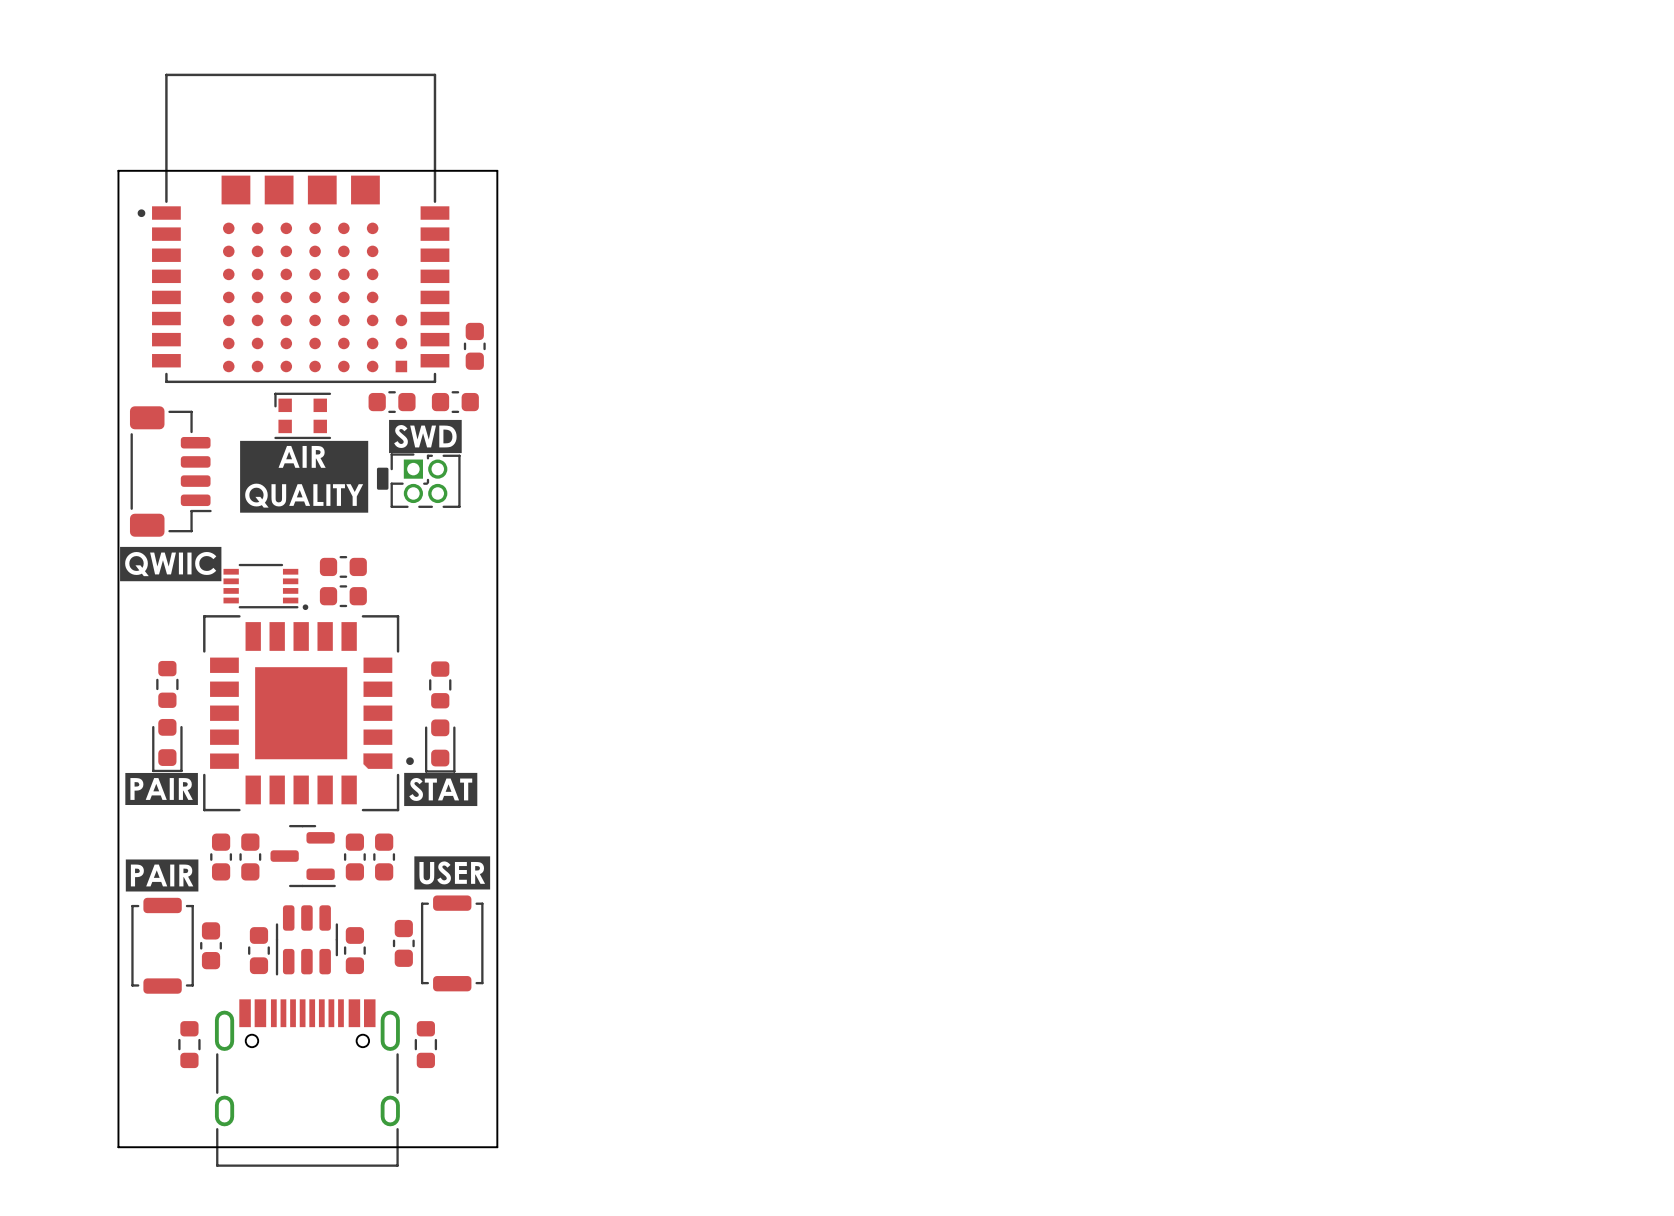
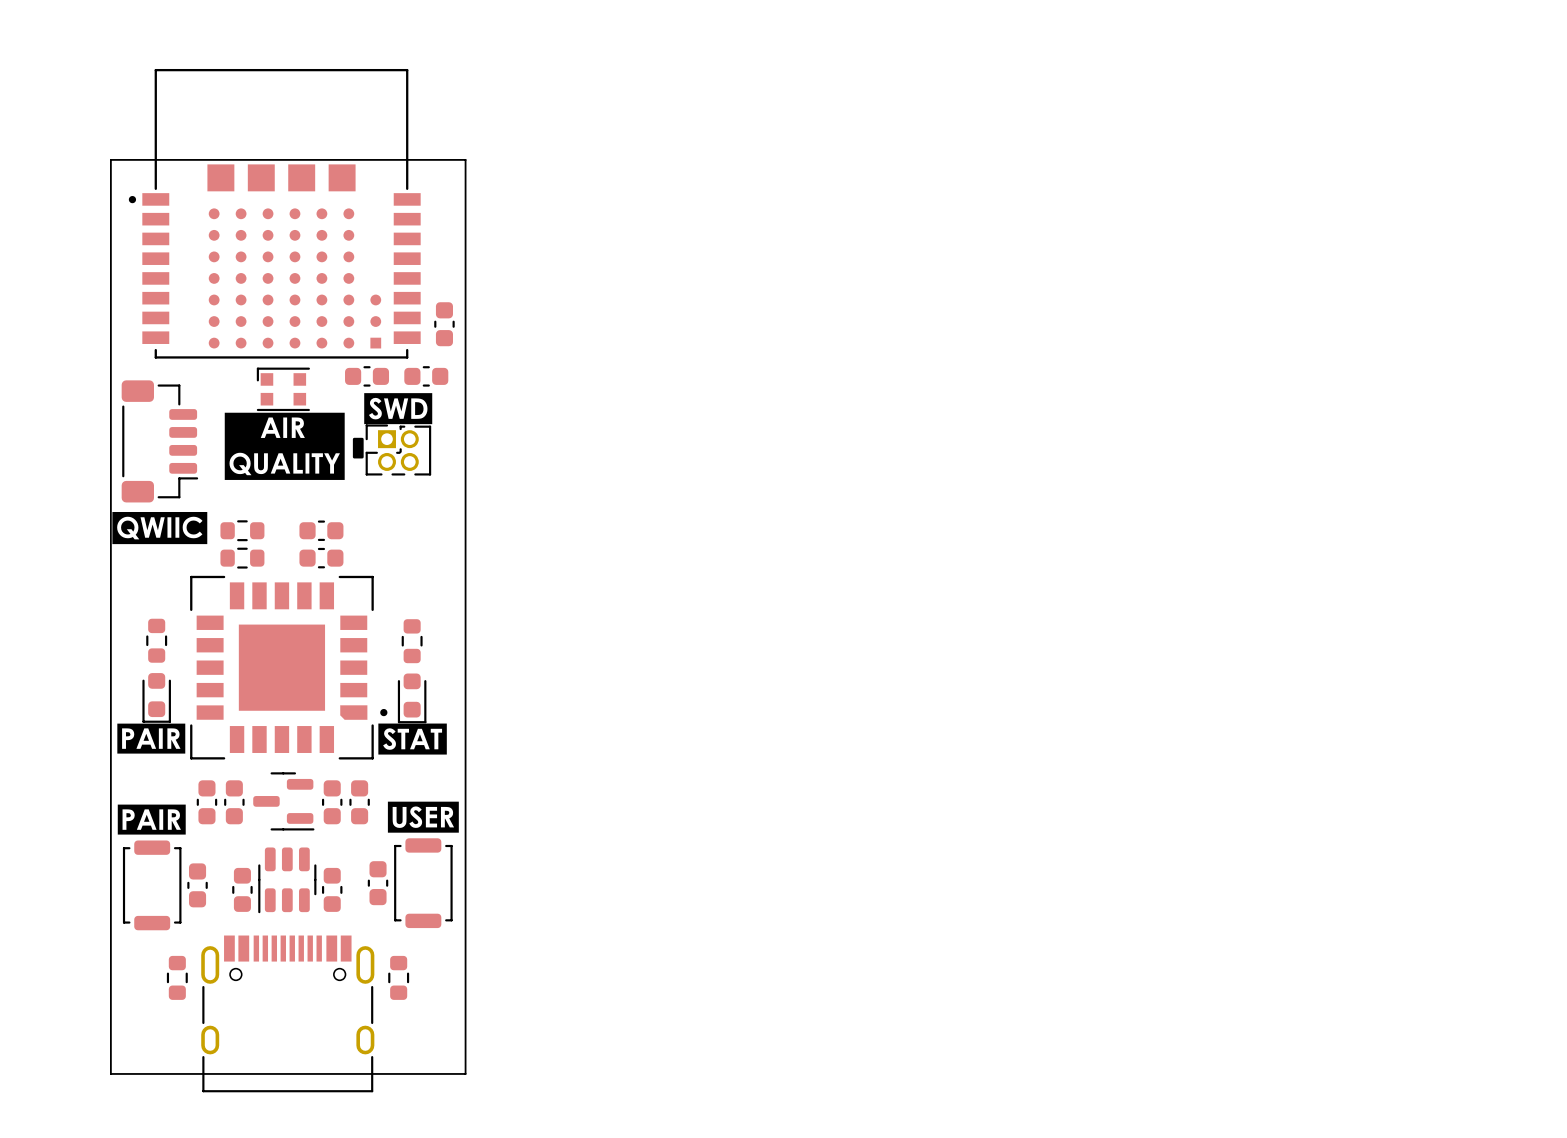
part: none -> (242, 530)
part: (260, 586) -> none
part: none -> (242, 558)
drawing: [302, 604, 309, 611] -> none

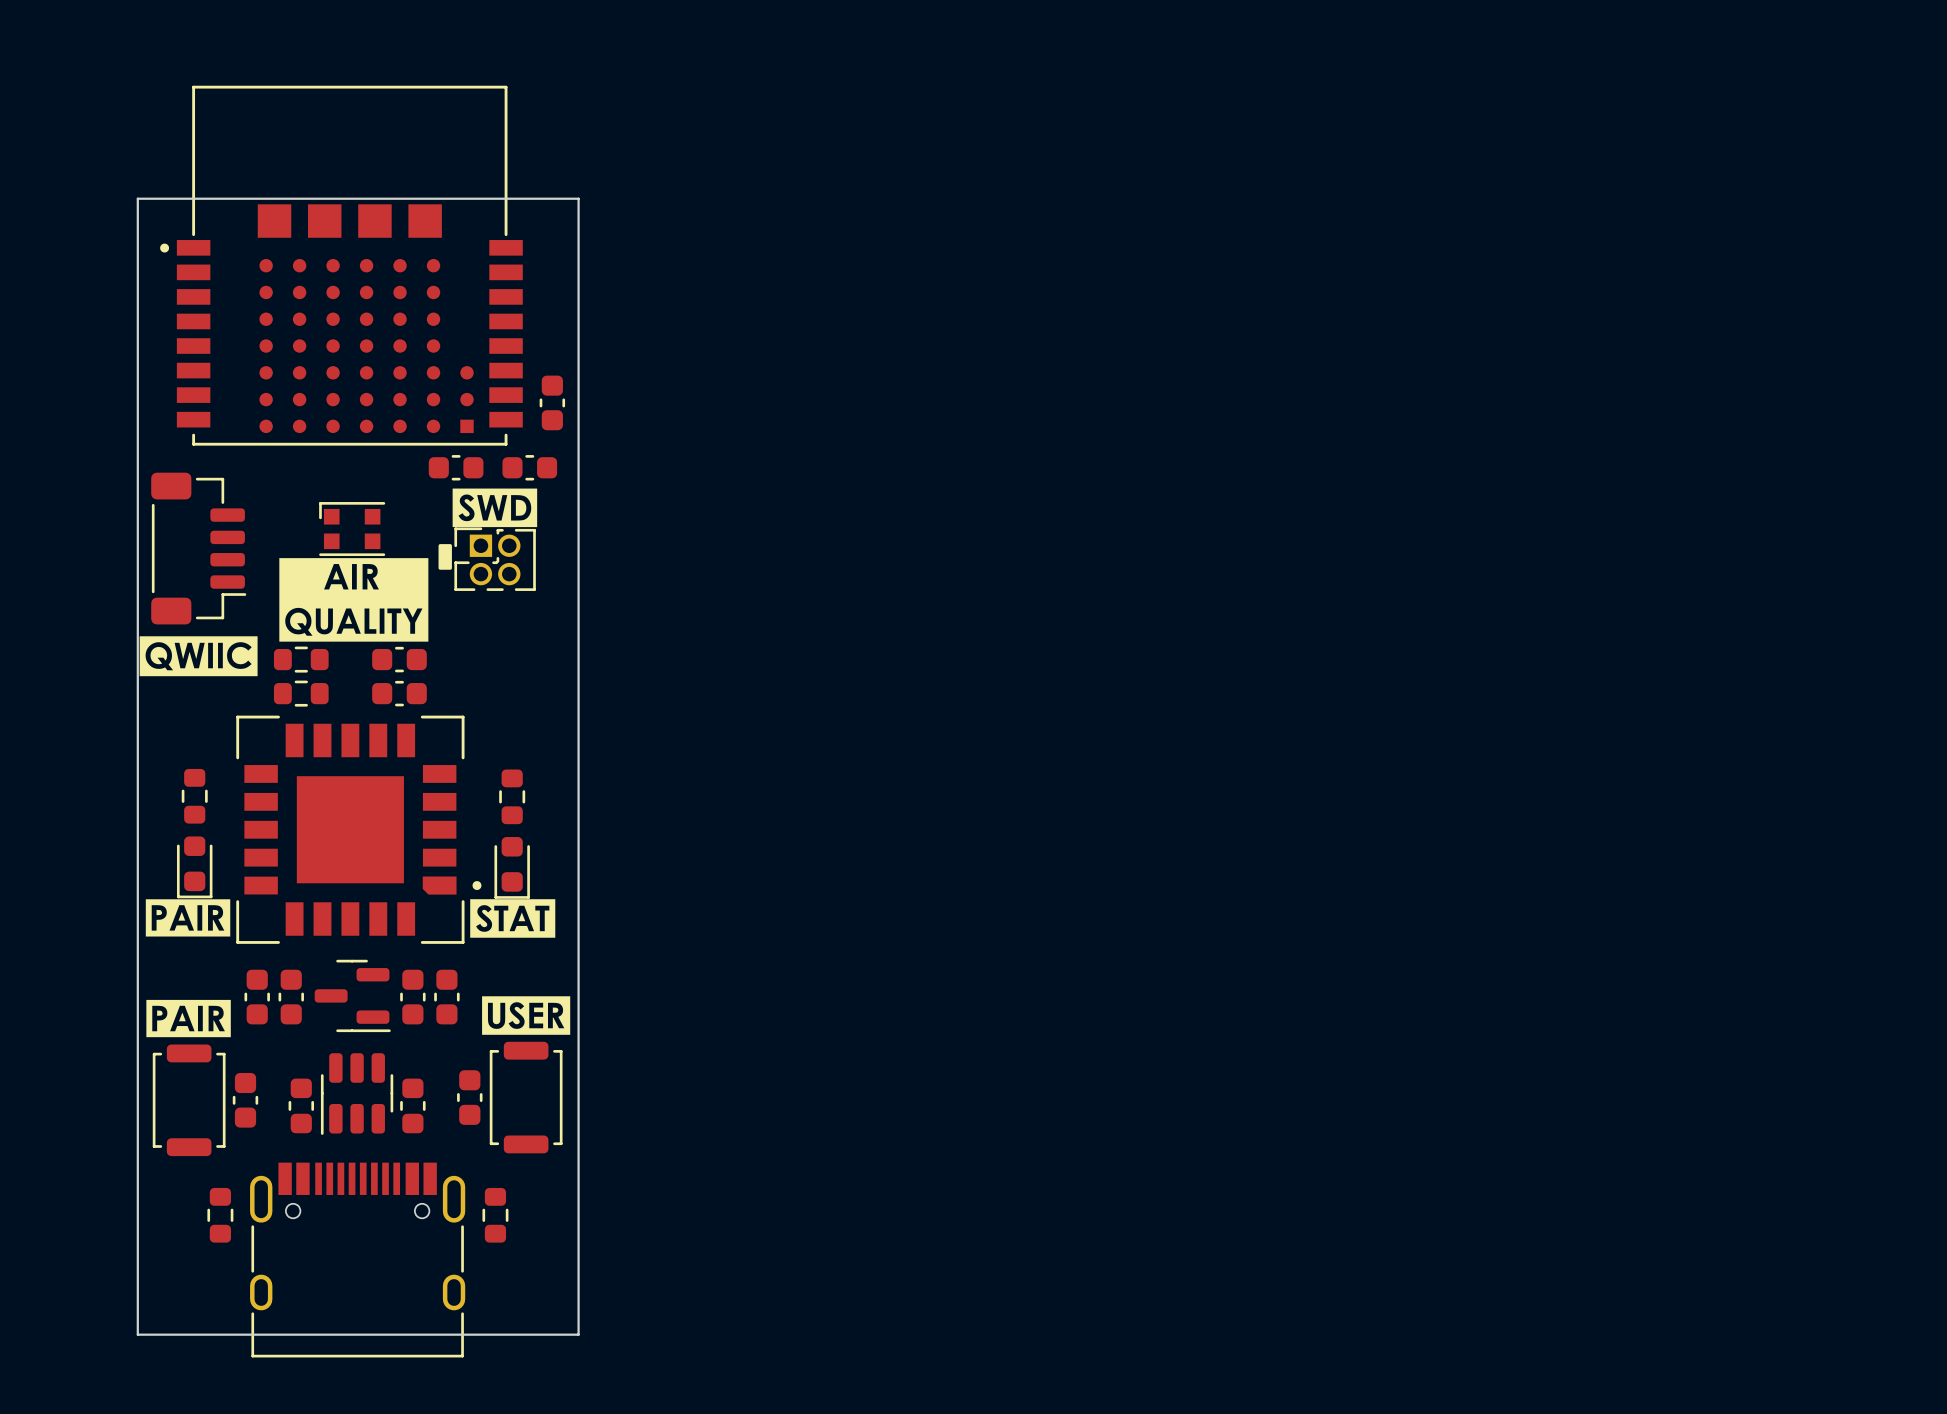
part position: (283, 389) -> (352, 529)
drawing position: (284, 446) -> (353, 599)

